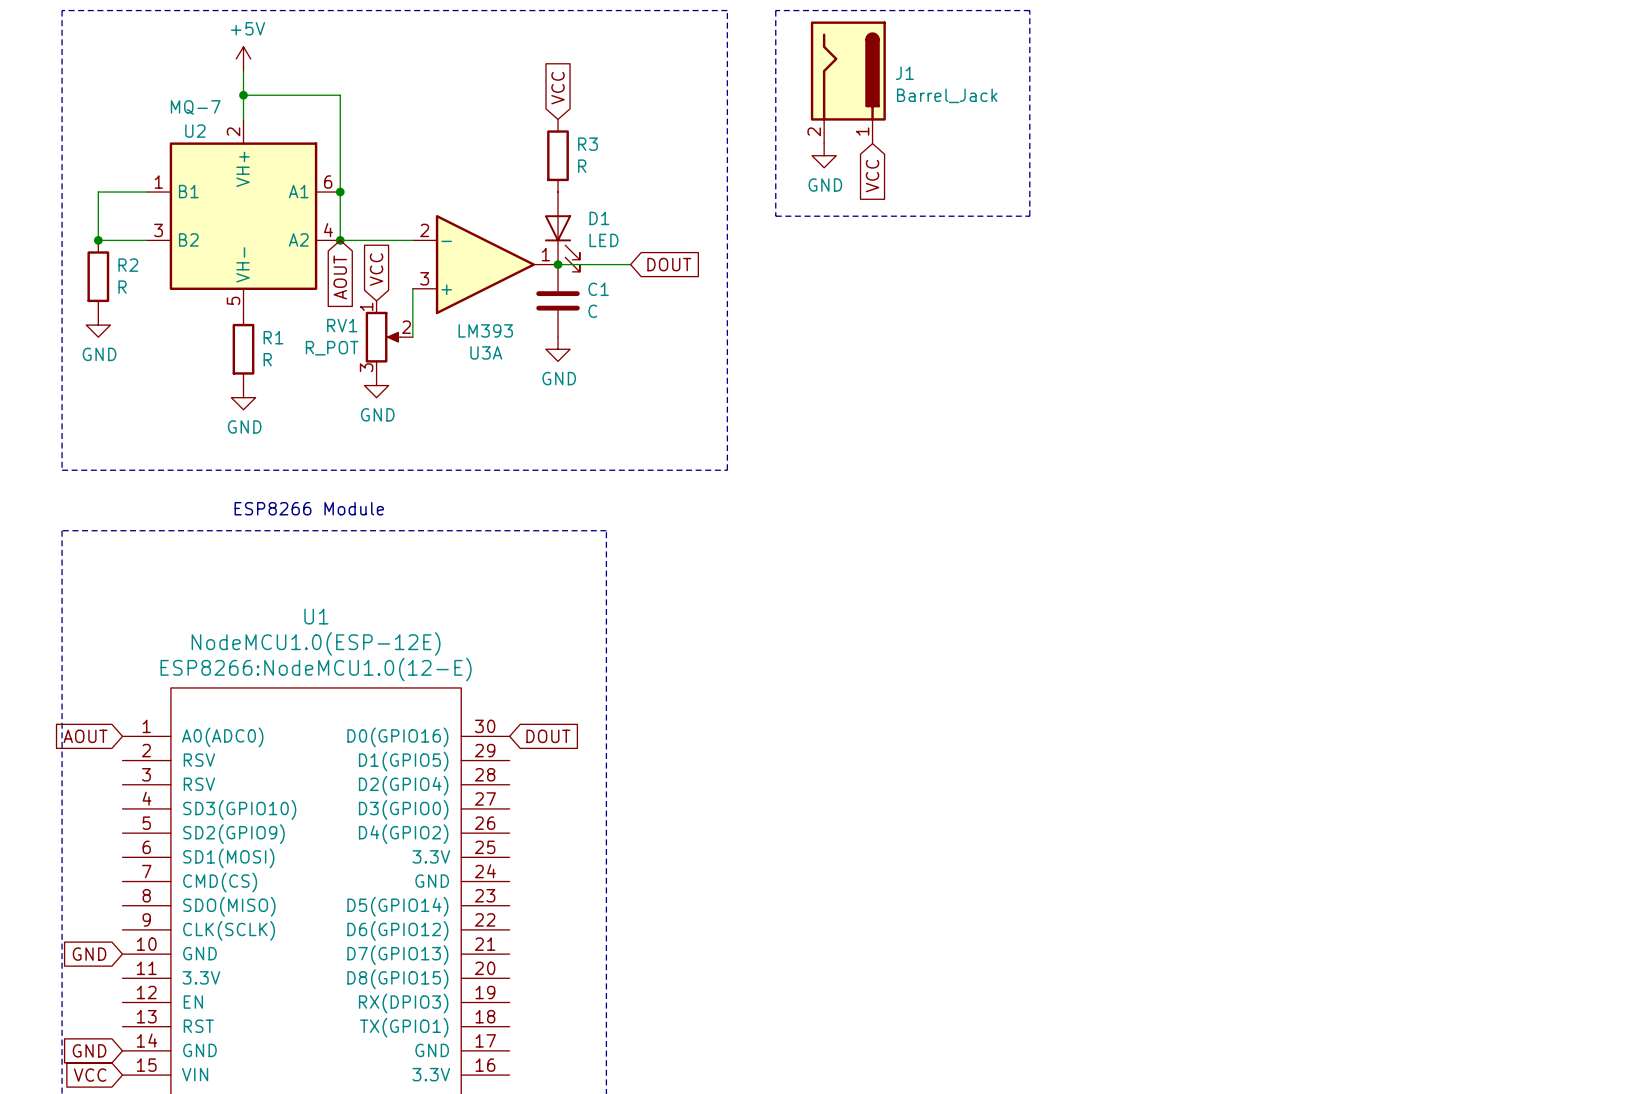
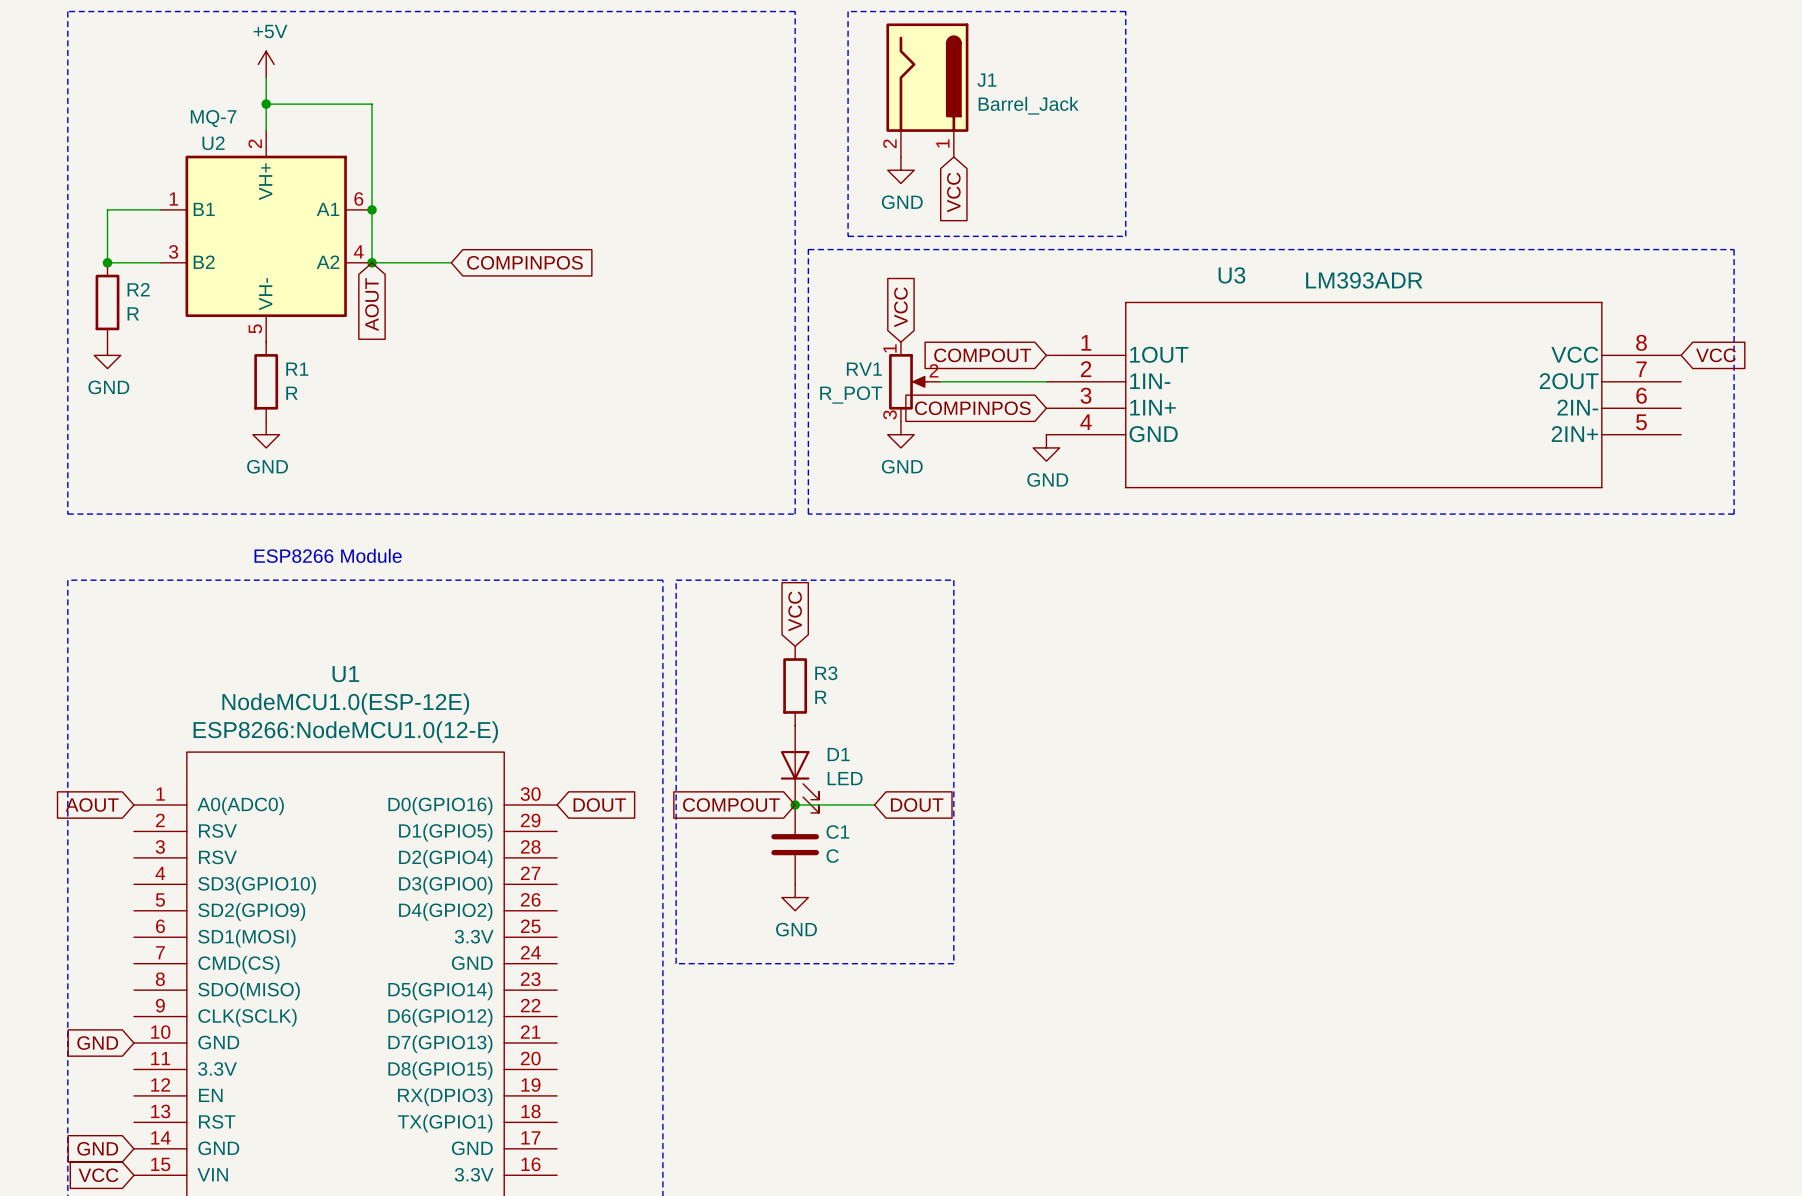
global label: VCC (558, 88) -> none
R3 position: (558, 155) -> (795, 685)
line: none -> (808, 249) (808, 514) (1734, 514) (1734, 249) (808, 249)
D1 position: (562, 231) -> (799, 769)
global label: none -> COMPINPOS (524, 262)
U3A: LM393 (485, 264) -> none
wire: (558, 264) (630, 264) -> none
junction: (558, 264) -> none
global label: DOUT (669, 264) -> none
global label: VCC (376, 269) -> none
global label: none -> VCC (900, 307)
wire: (412, 288) (412, 337) -> none
C1 position: (558, 300) -> (795, 844)
global label: none -> COMPOUT (982, 355)
global label: none -> VCC (1716, 355)
RV1 position: (389, 337) -> (914, 381)
power symbol: GND (558, 349) -> none
wire: none -> (940, 381) (1046, 381)
U3: none -> LM393ADR (1363, 395)
global label: none -> COMPINPOS (972, 408)
power symbol: GND (376, 385) -> none
power symbol: none -> GND (900, 434)
power symbol: none -> GND (1046, 447)
line: none -> (676, 580) (953, 580) (953, 963) (676, 963) (676, 580)
global label: none -> VCC (795, 611)
global label: none -> COMPOUT (731, 804)
wire: none -> (795, 804) (874, 804)
junction: none -> (795, 804)
global label: none -> DOUT (917, 804)
power symbol: none -> GND (795, 897)

